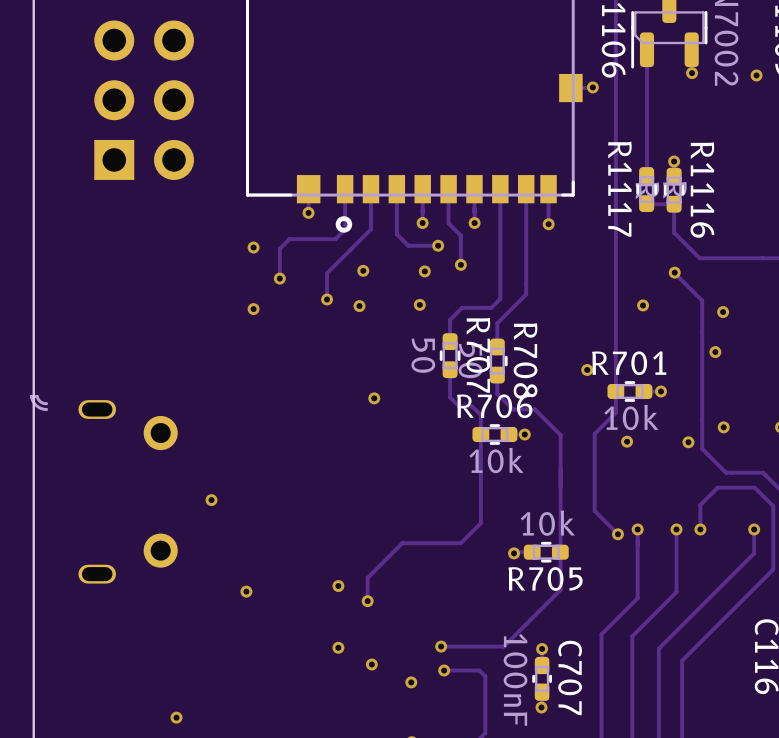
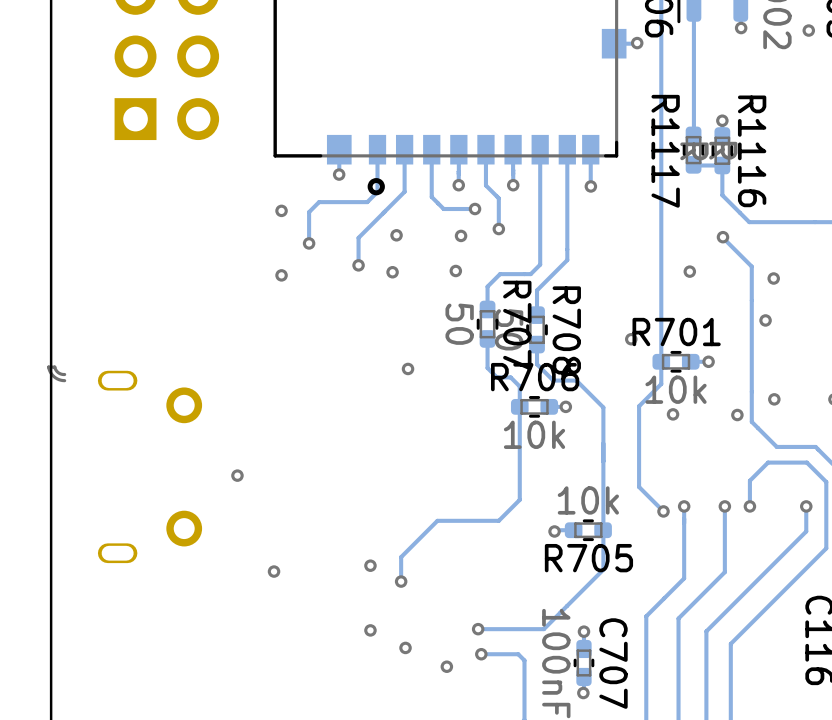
via: (176, 717) -> none

